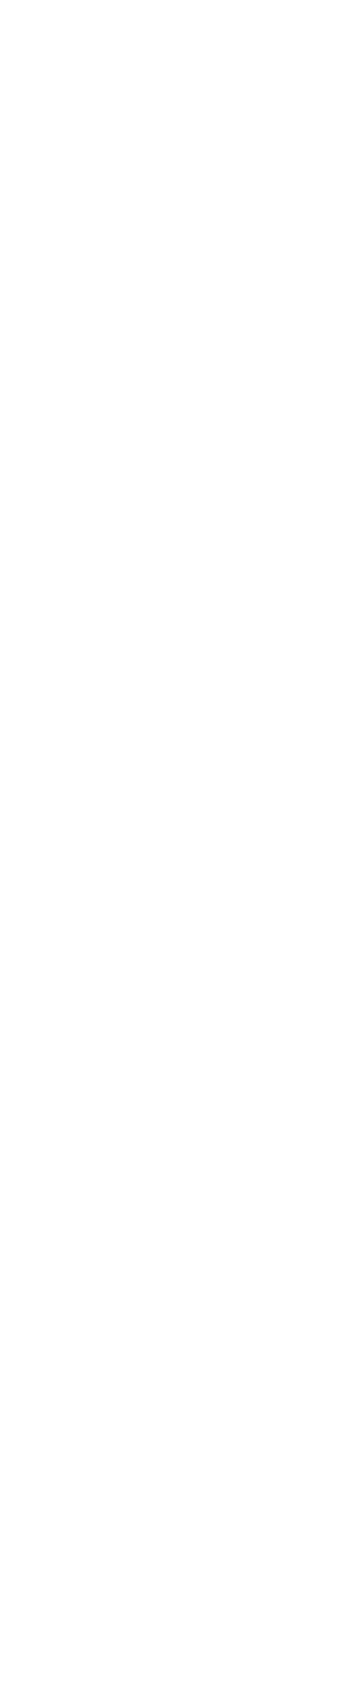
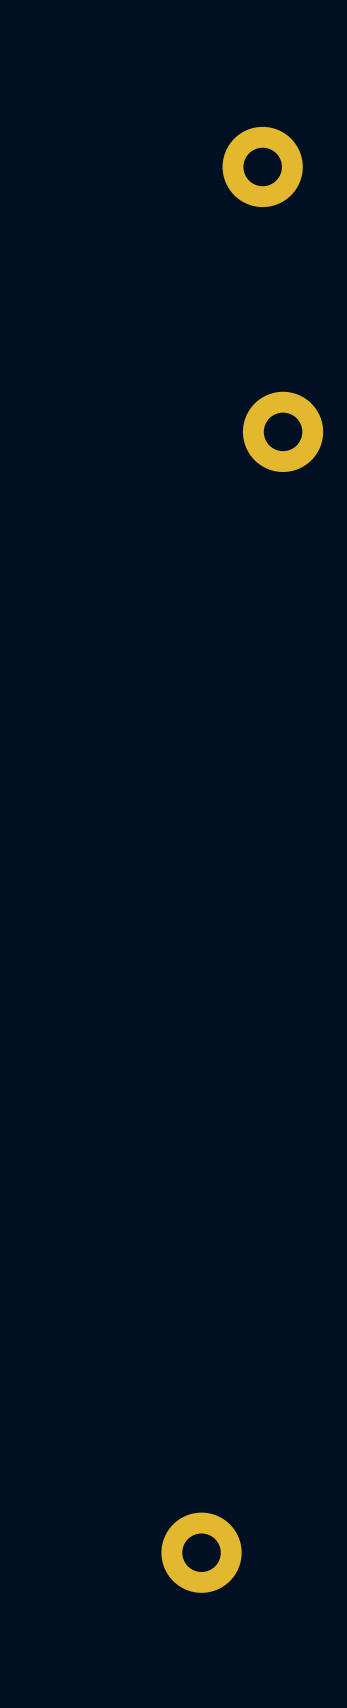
part: none -> (262, 166)
part: none -> (283, 431)
part: none -> (201, 1552)

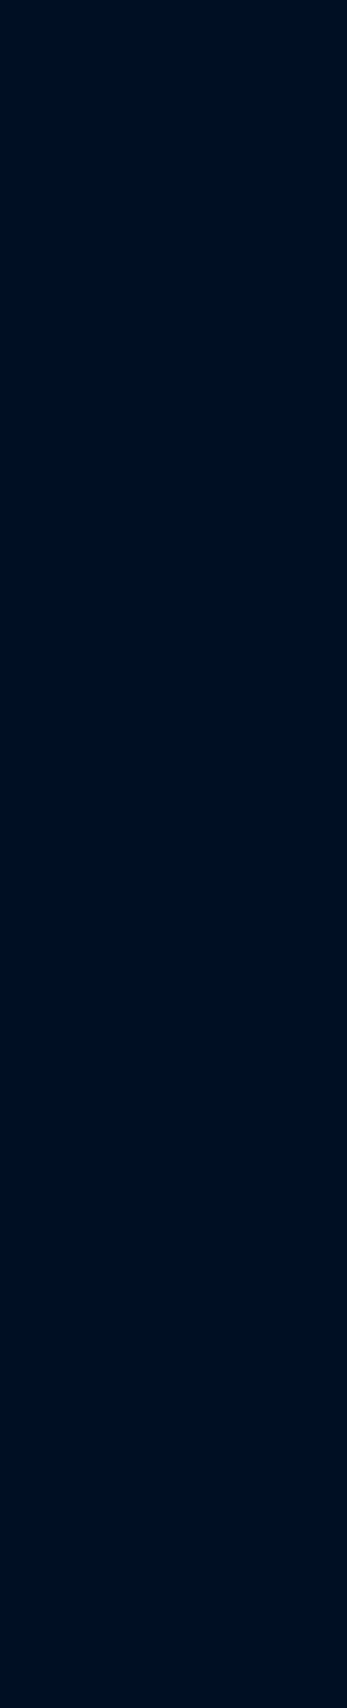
part: (262, 166) -> none
part: (283, 431) -> none
part: (201, 1552) -> none

